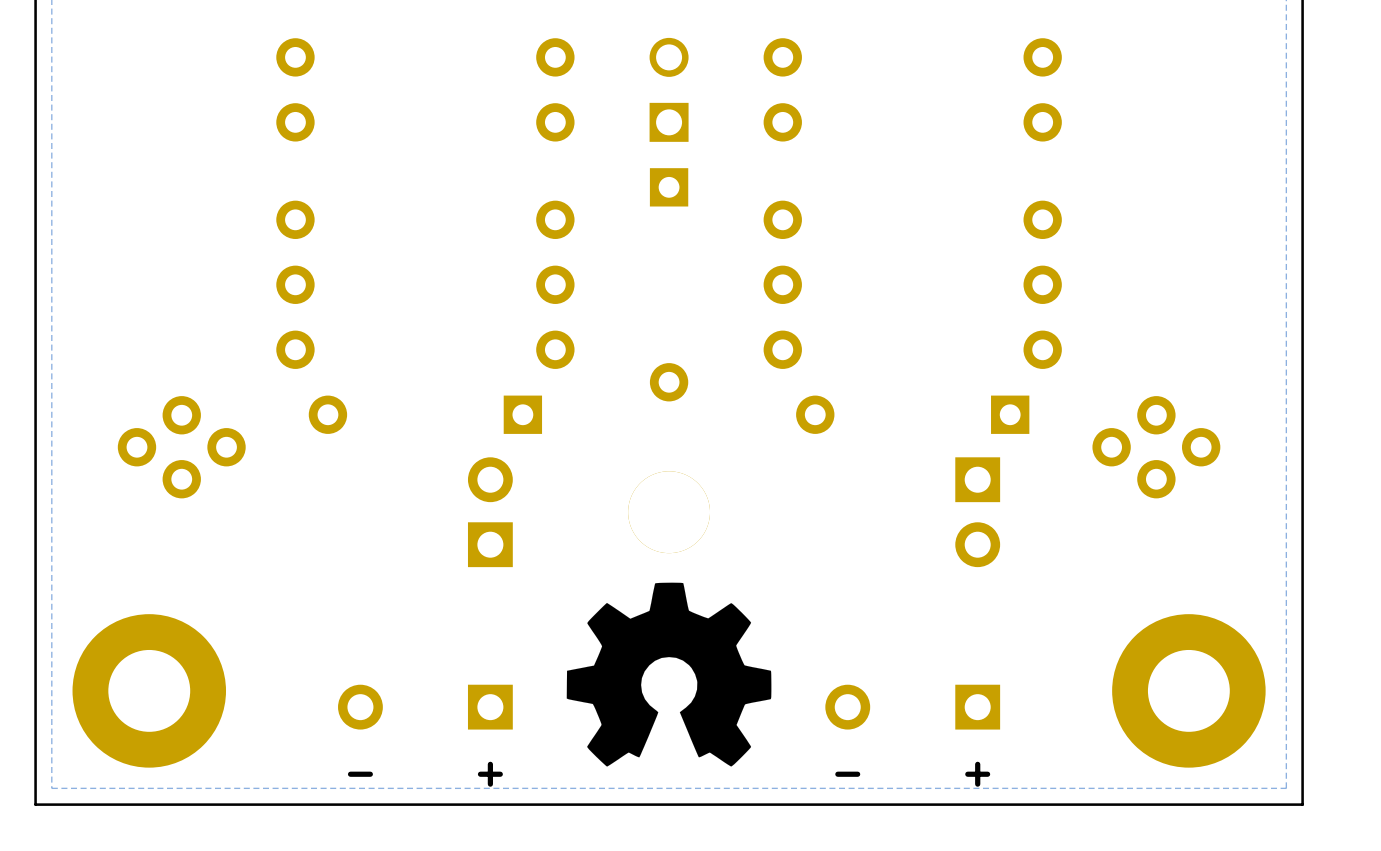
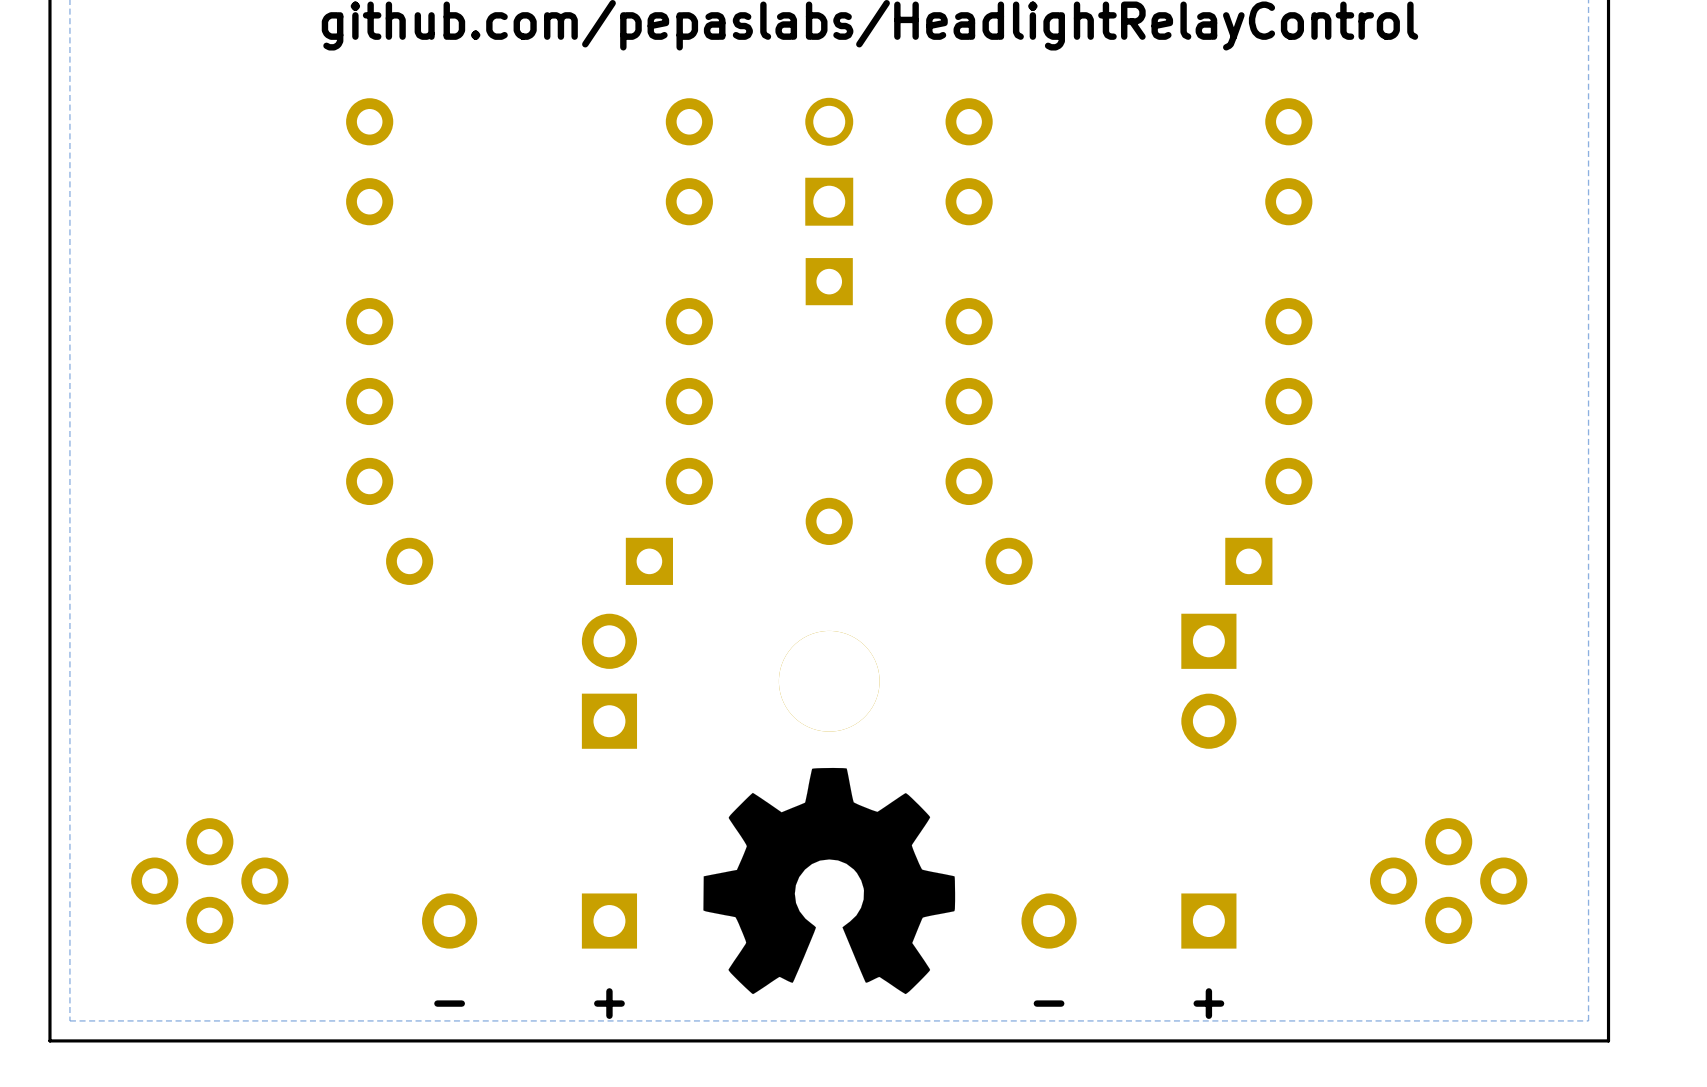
part: (181, 447) -> none
part: (1156, 447) -> none
part footprint: [72, 614, 227, 768] -> [131, 818, 289, 944]
part footprint: [1112, 614, 1266, 768] -> [1370, 818, 1528, 944]

